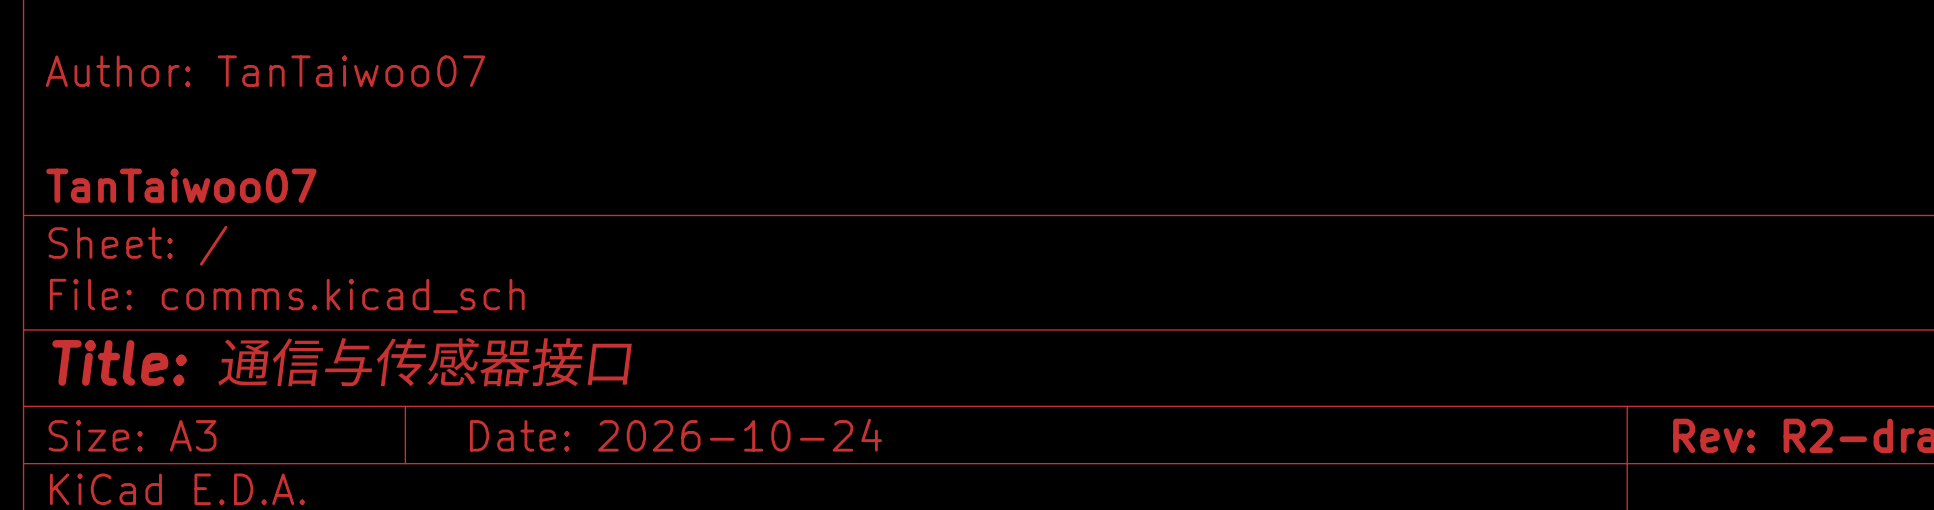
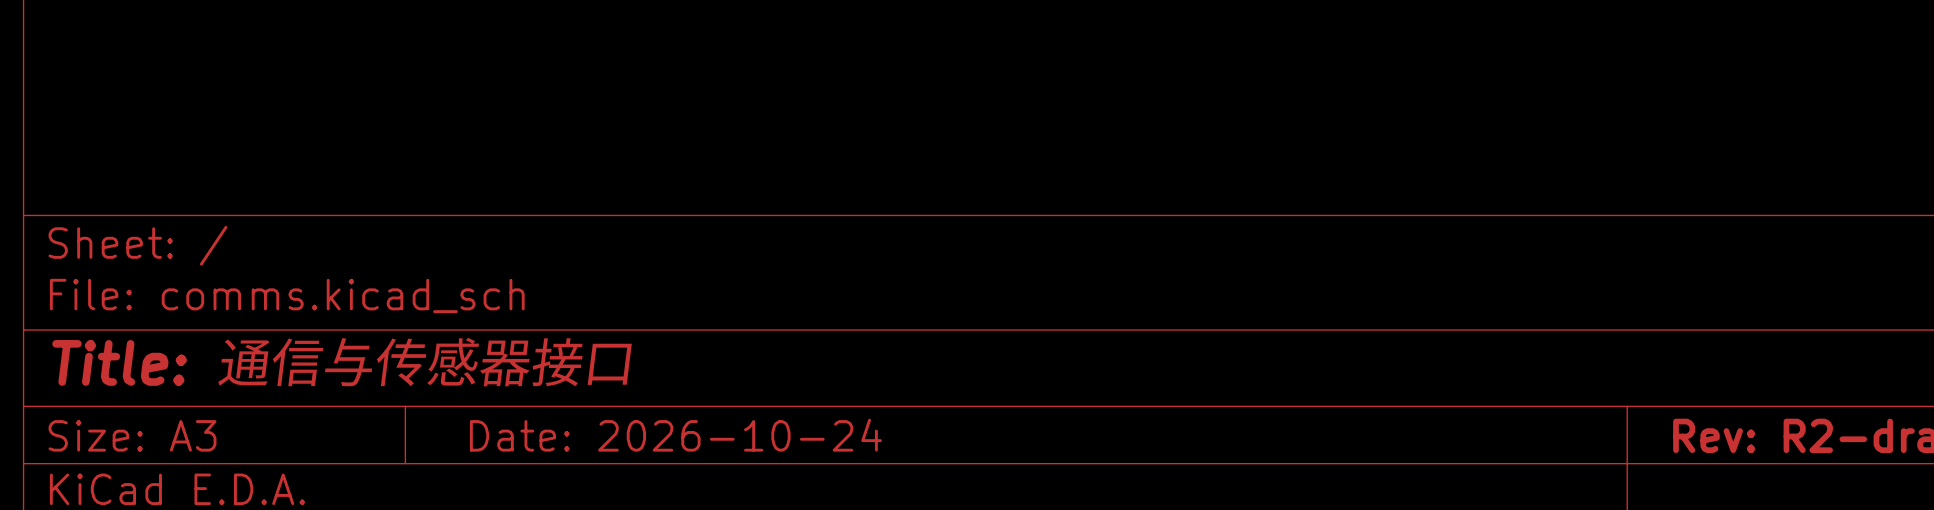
title block: Author: TanTaiwoo07 (265, 71) -> none
title block: TanTaiwoo07 (181, 185) -> none

